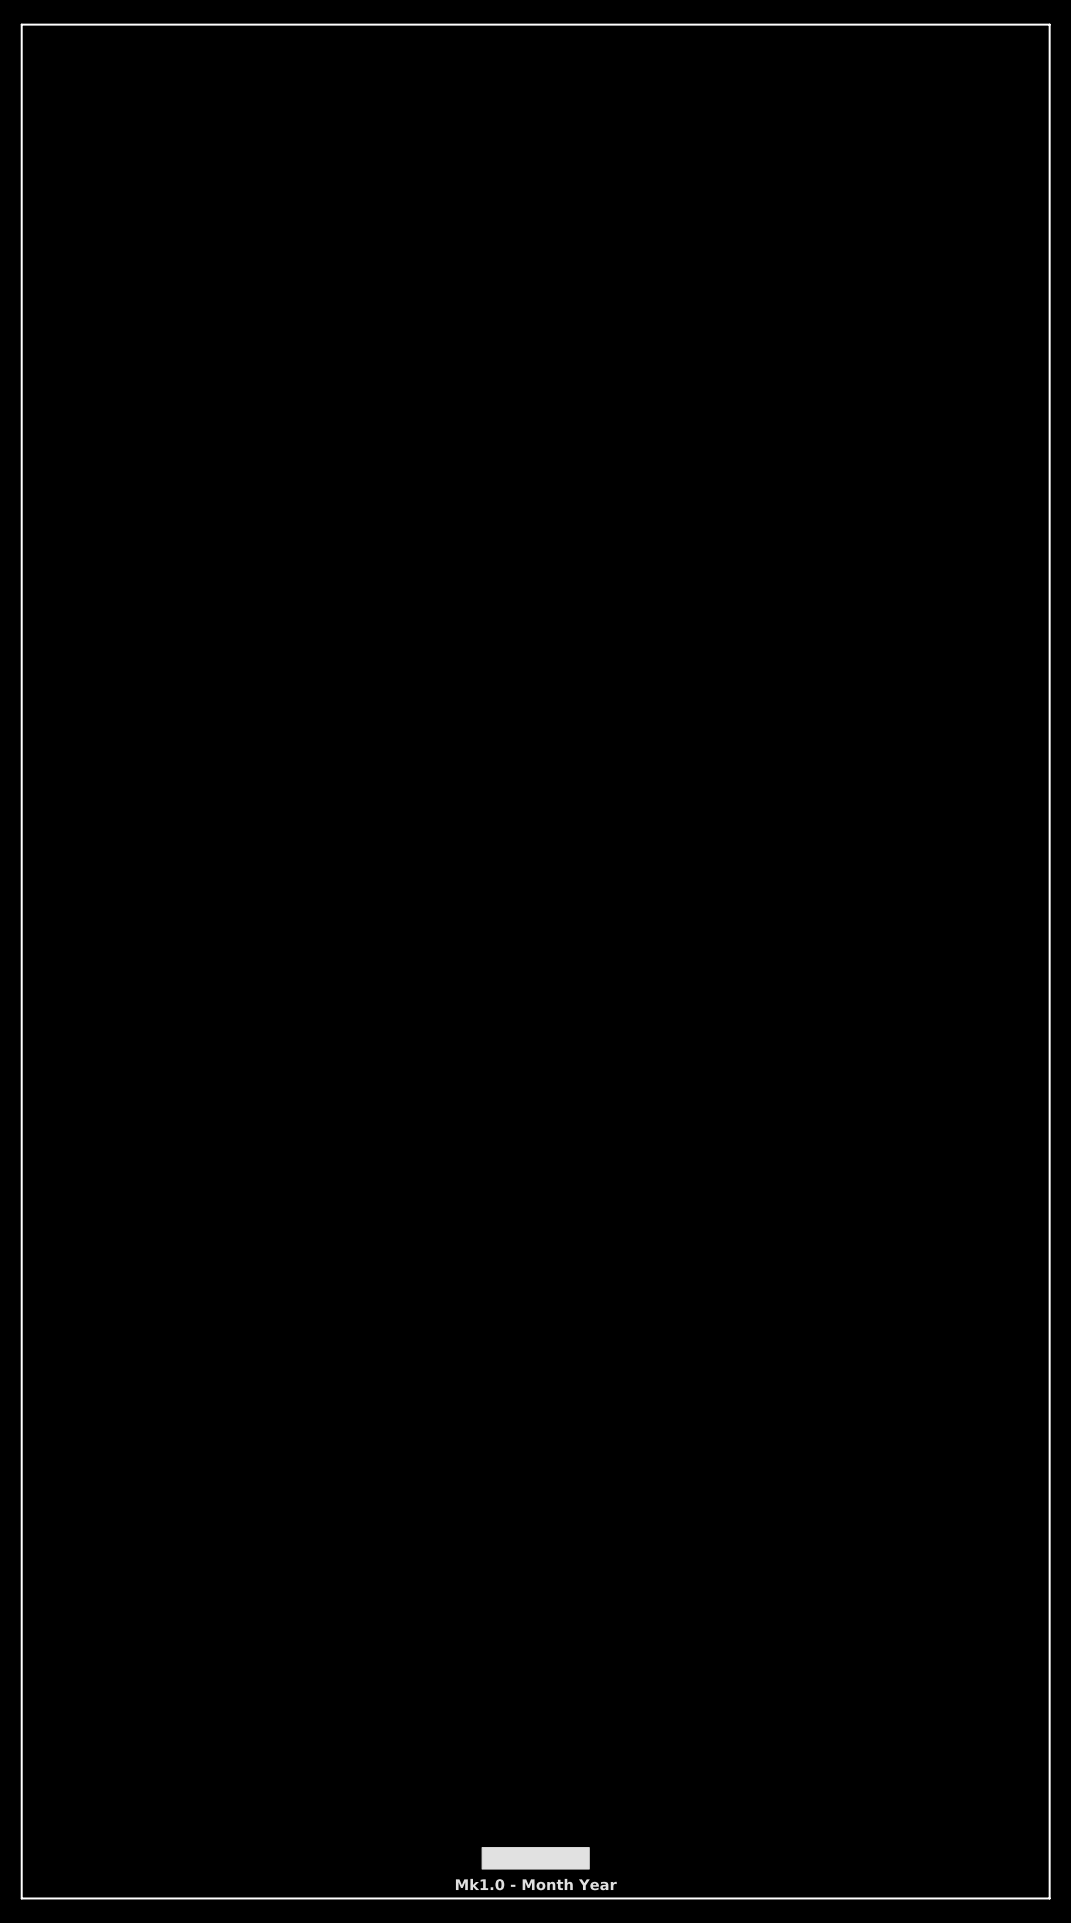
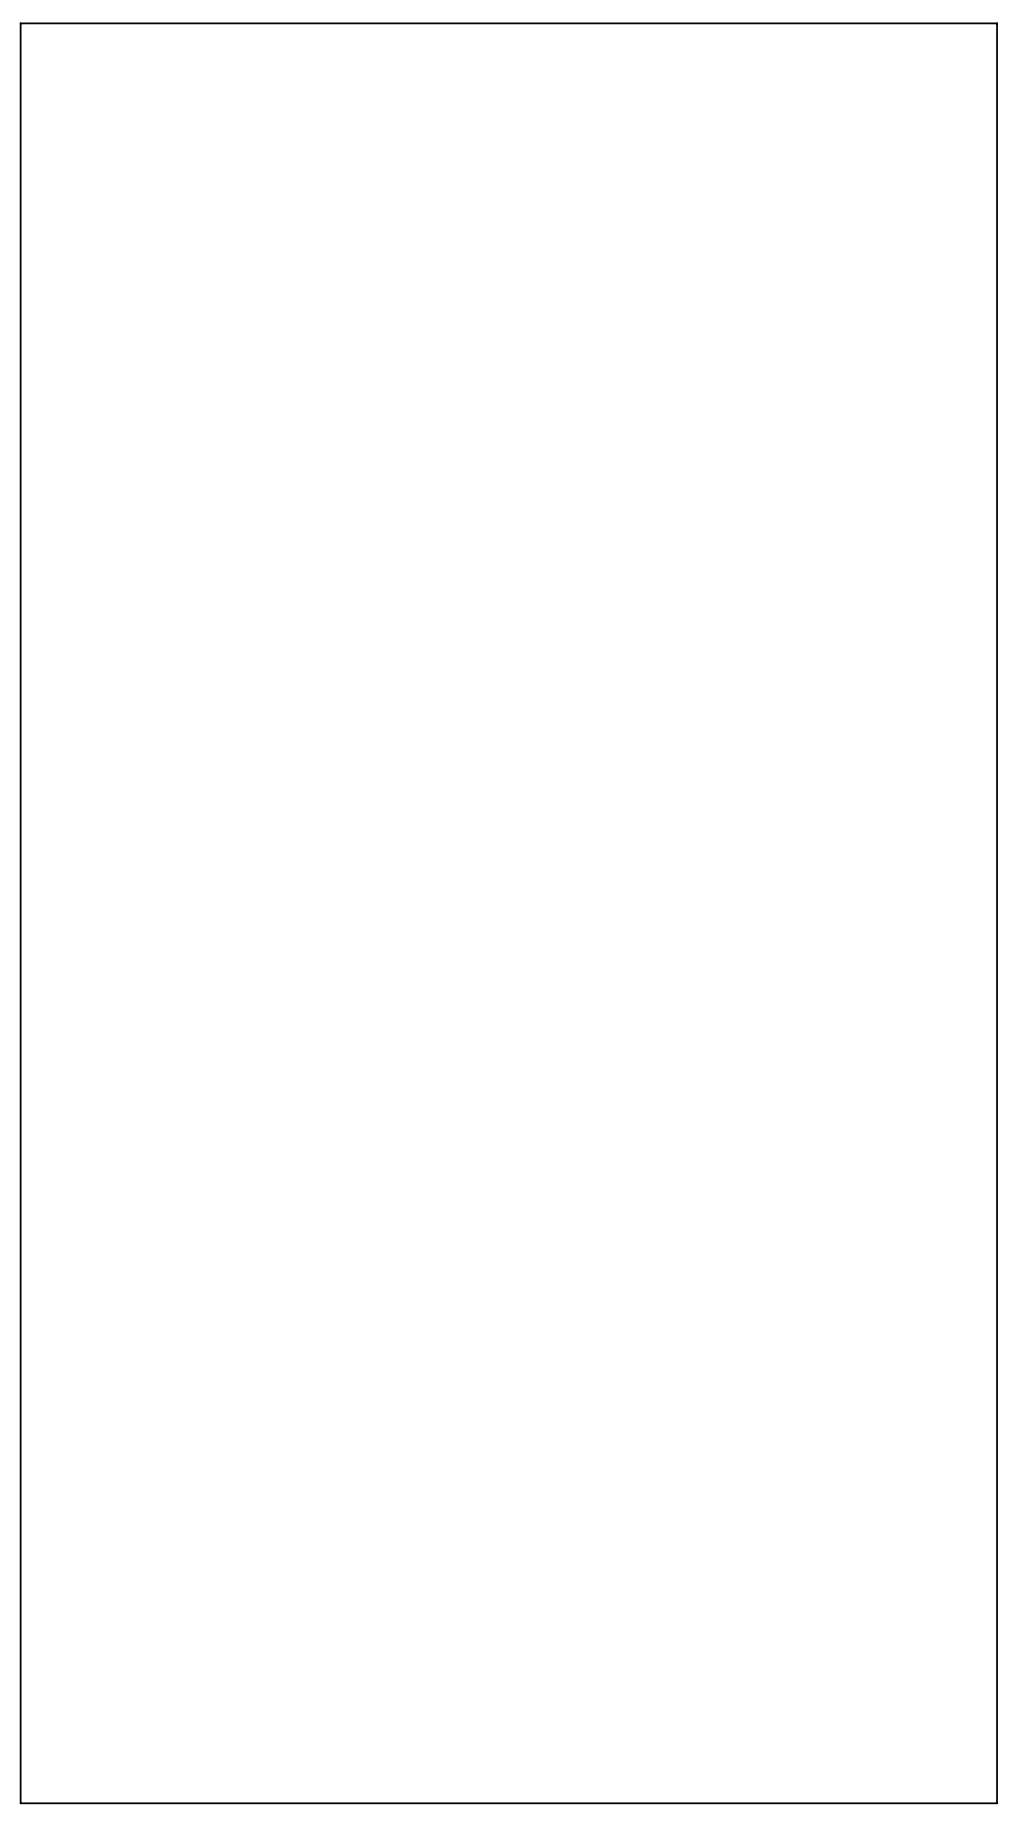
drawing: [481, 1847, 590, 1870] -> none
text: Mk1.0 - Month Year (536, 1884) -> none

